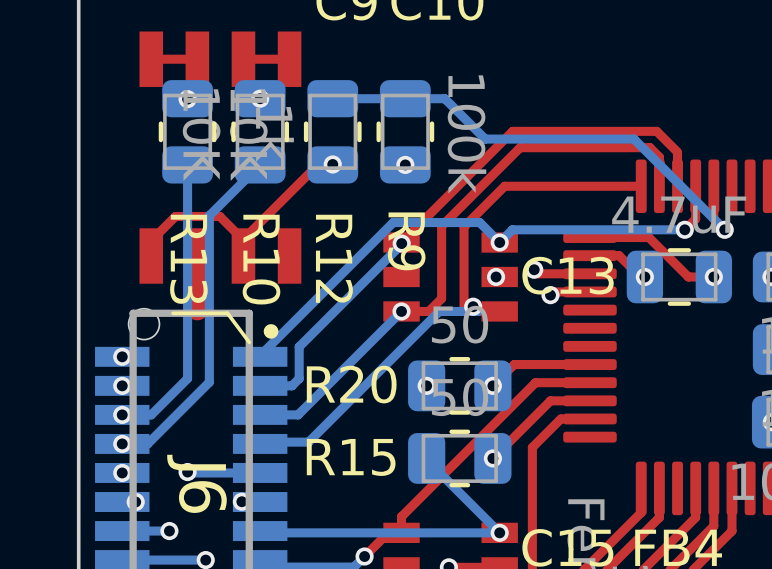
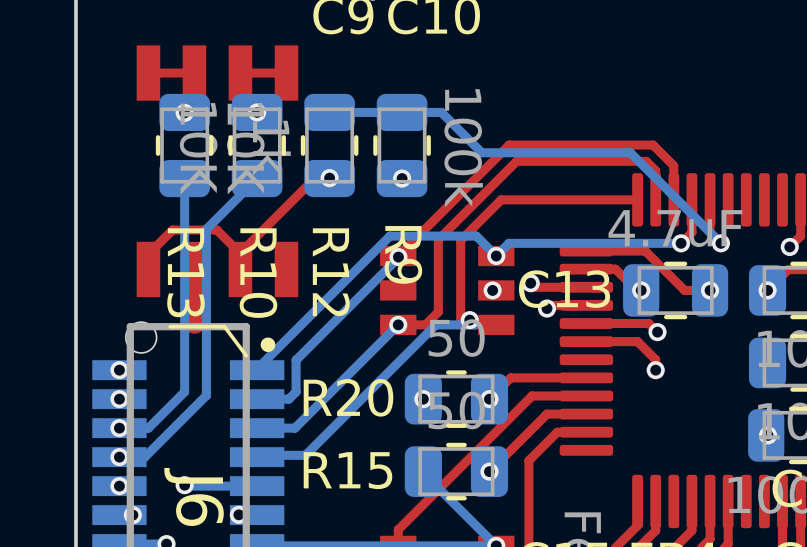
top track: none -> (586, 323) (648, 323) (657, 332)
via: none -> (657, 332)
top track: none -> (586, 341) (637, 341) (655, 359) (655, 370)
via: none -> (655, 370)

